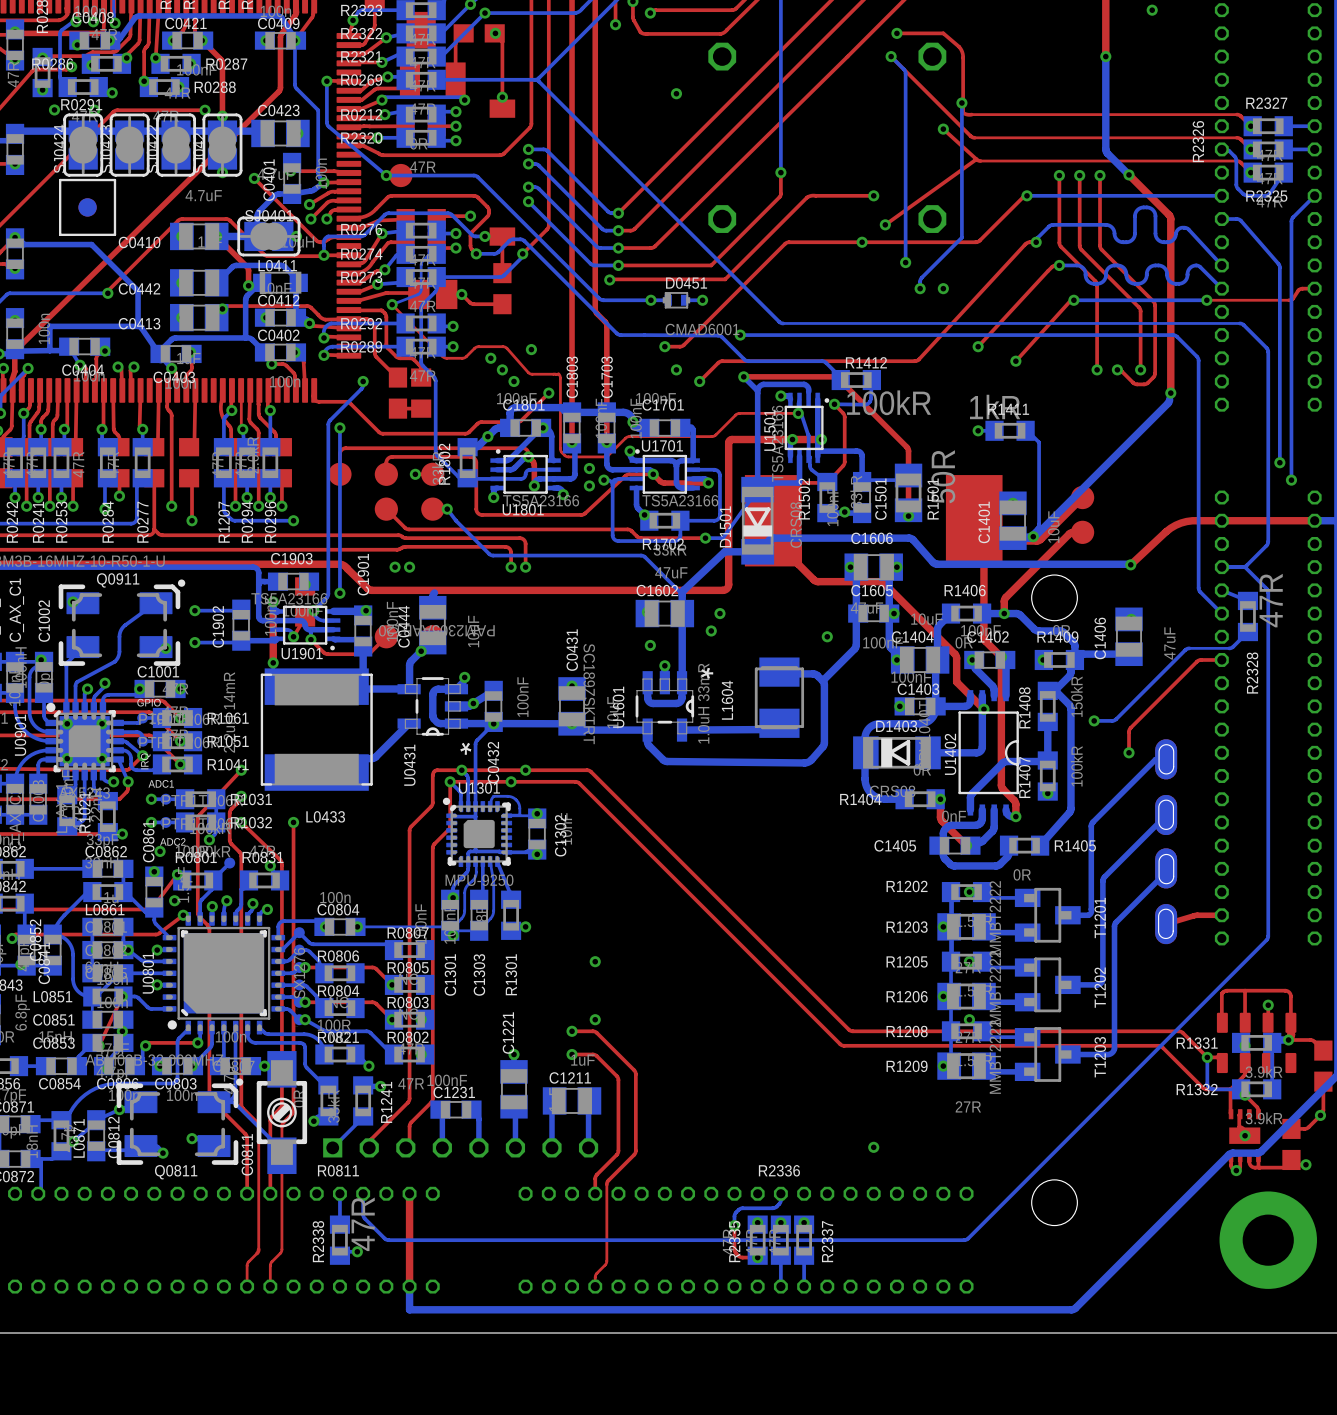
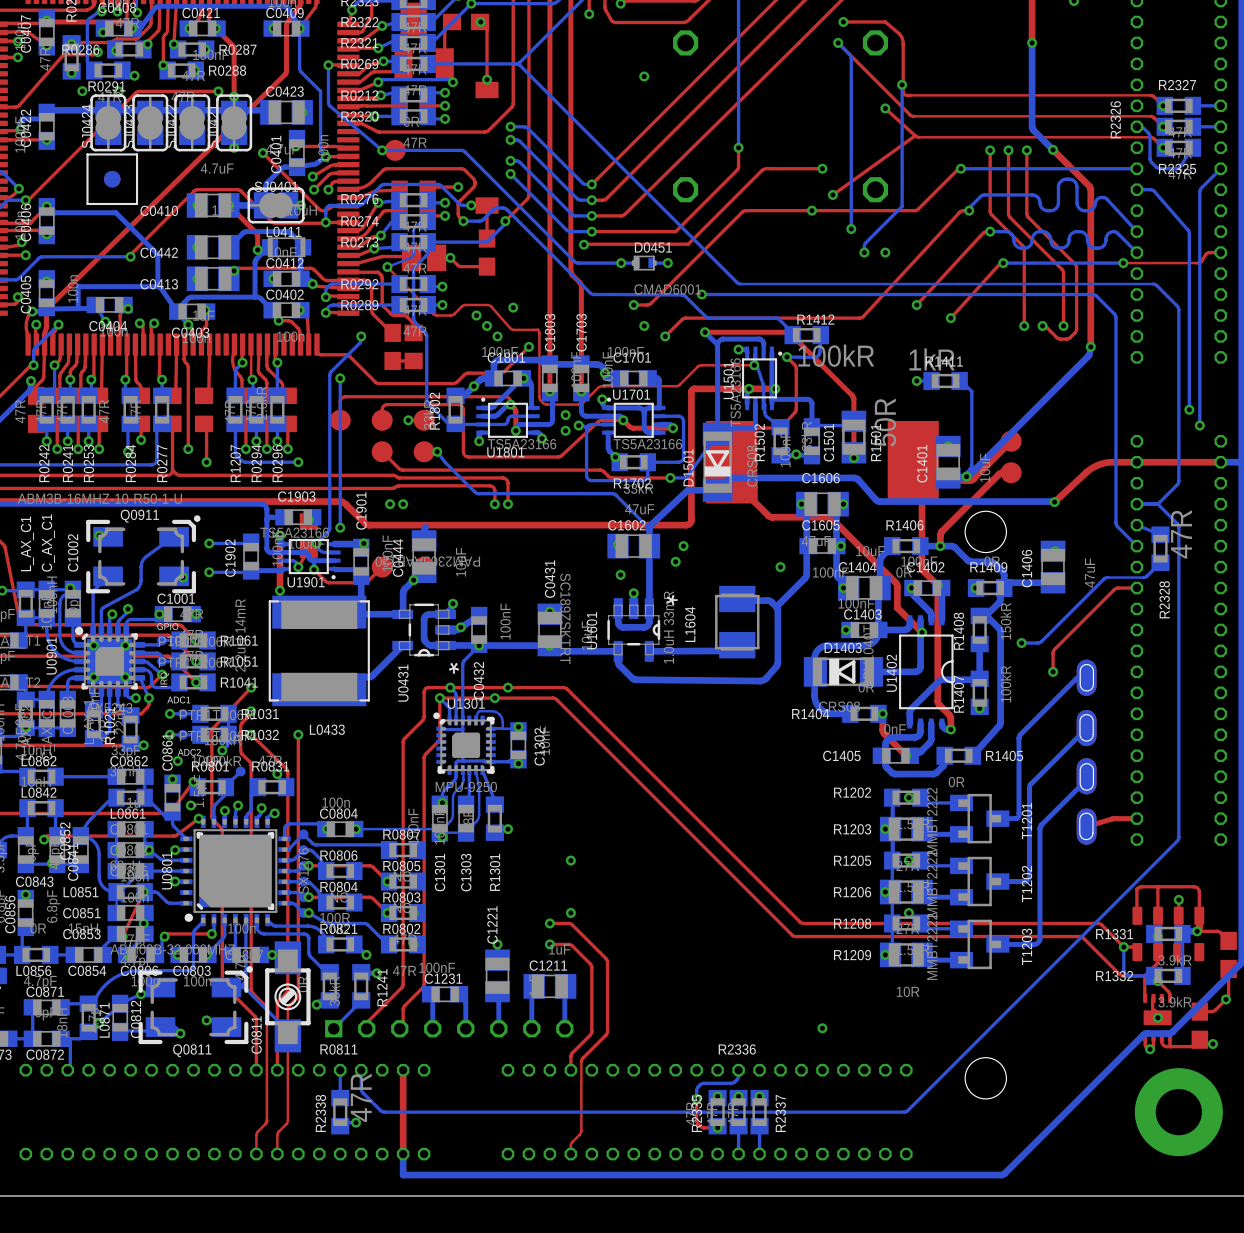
R1209 value: 27R (968, 1106) -> 10R (908, 991)

